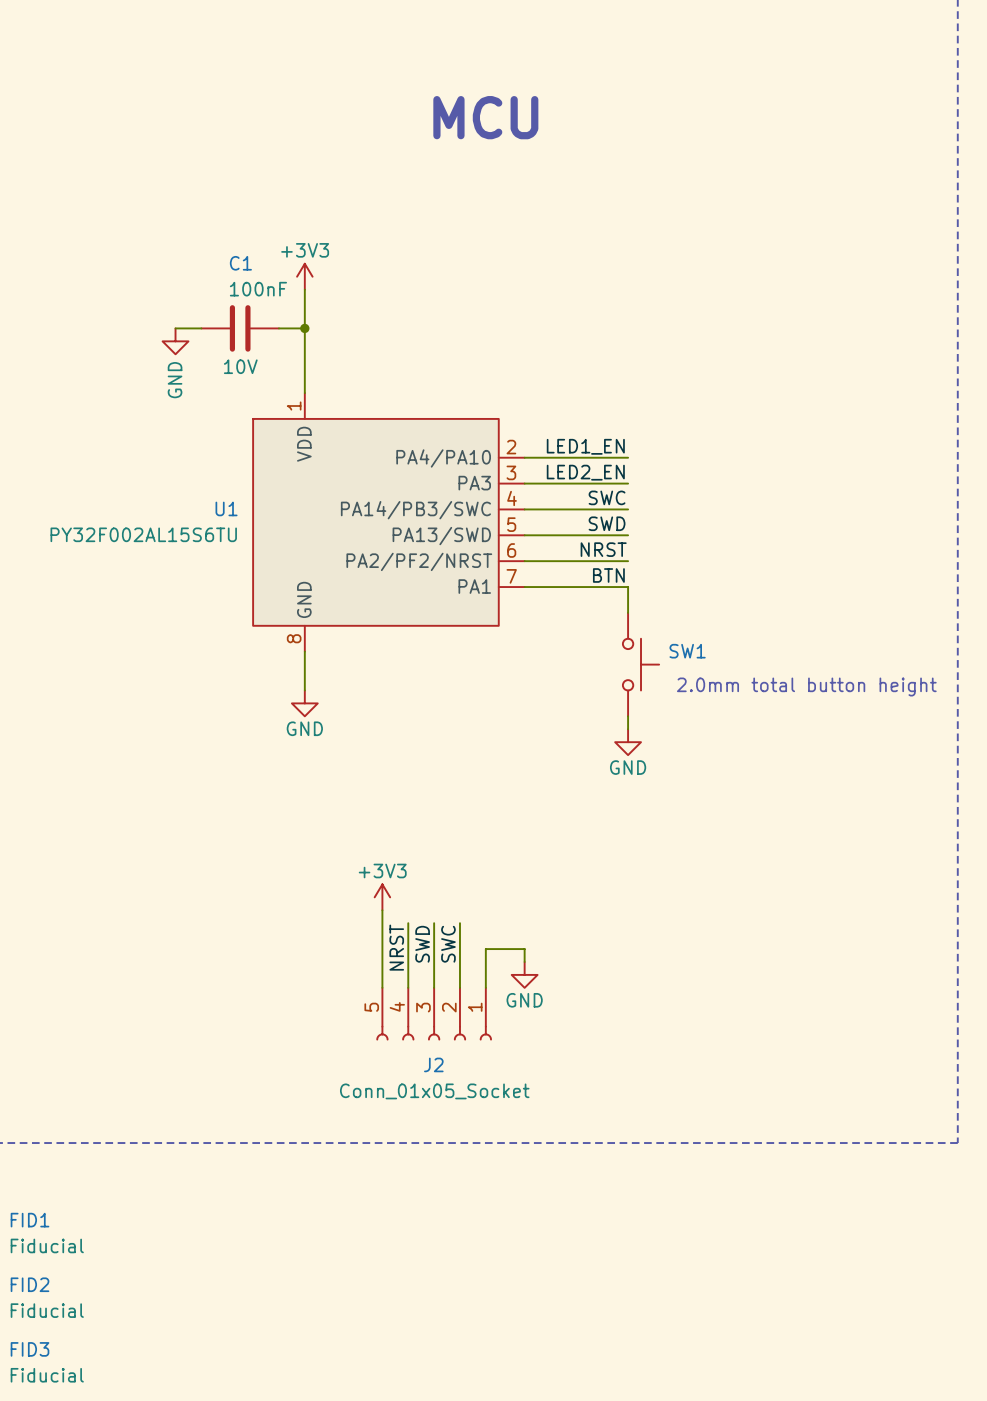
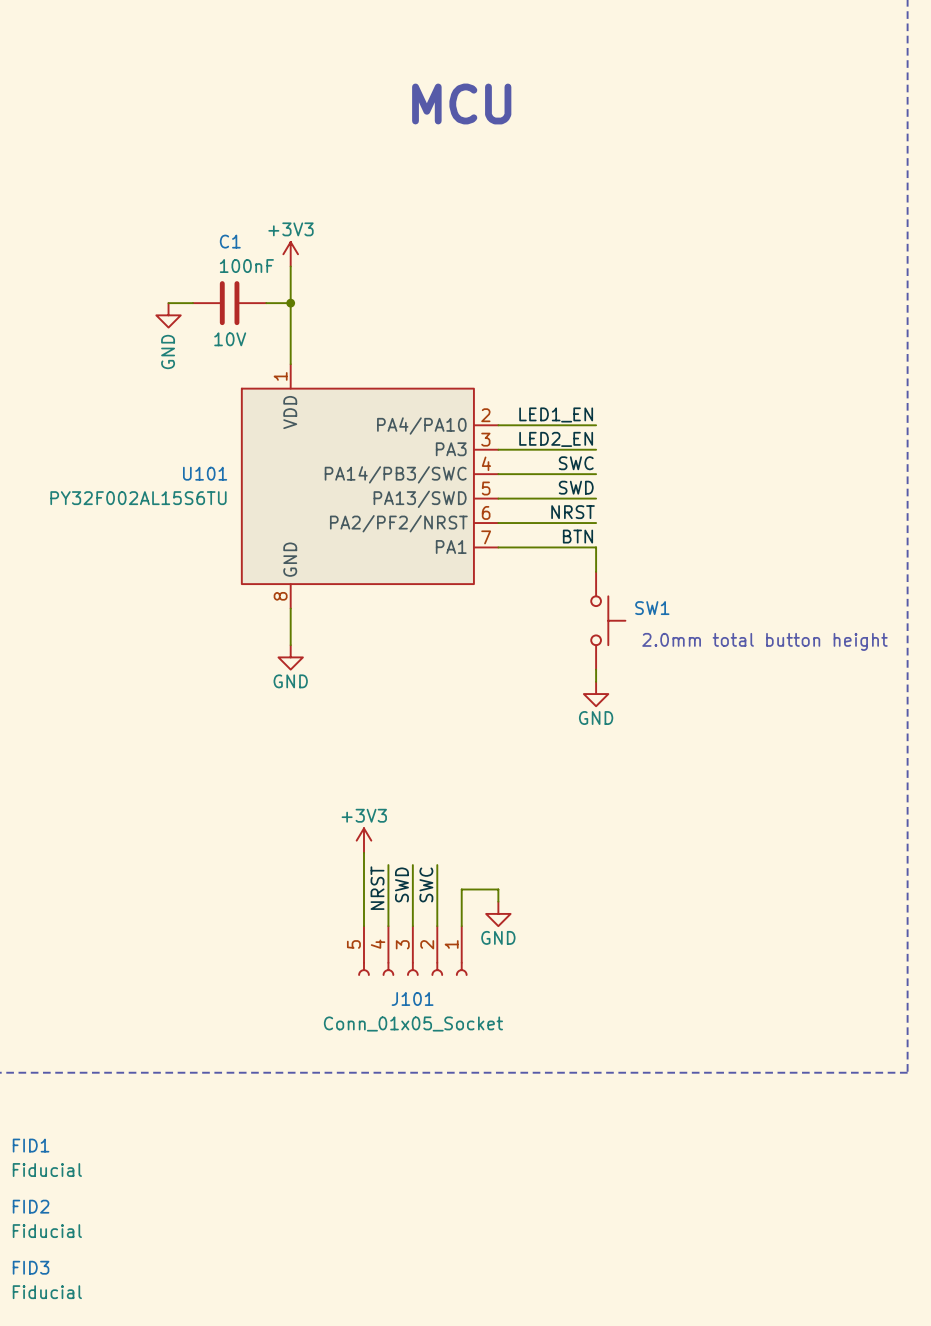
U1 name: U1 (226, 508) -> U101 (205, 473)
J2 name: J2 (433, 1064) -> J101 (412, 998)

